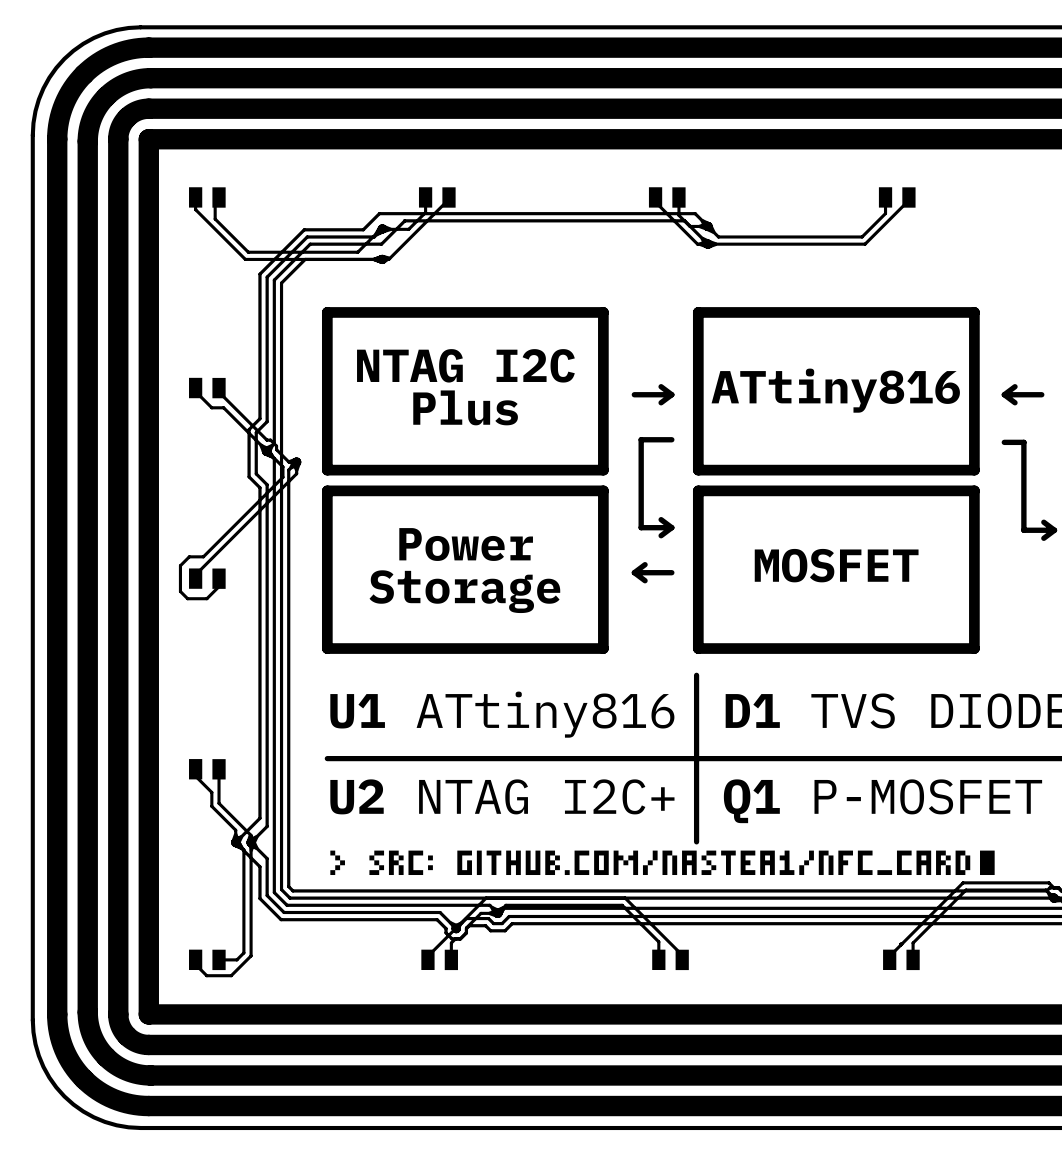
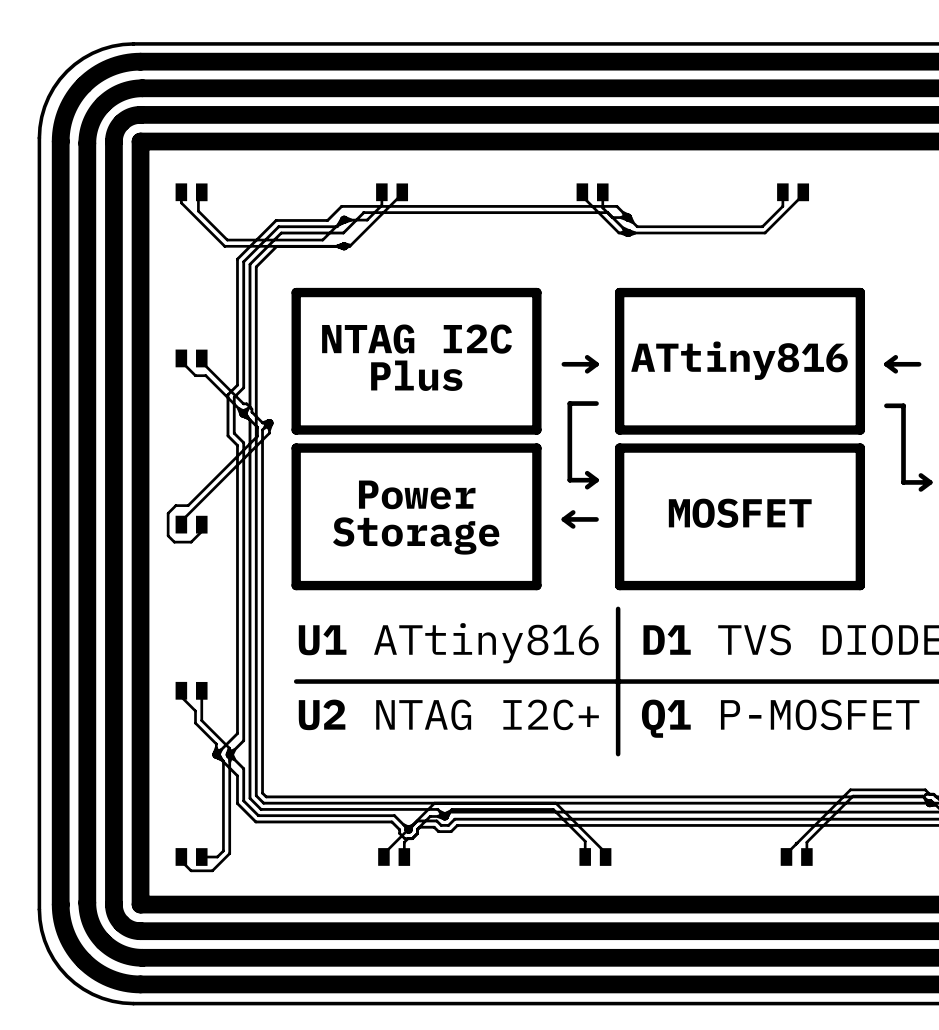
drawing: [330, 850, 345, 876] -> none
drawing: [369, 850, 433, 876] -> none
drawing: [457, 850, 995, 876] -> none

